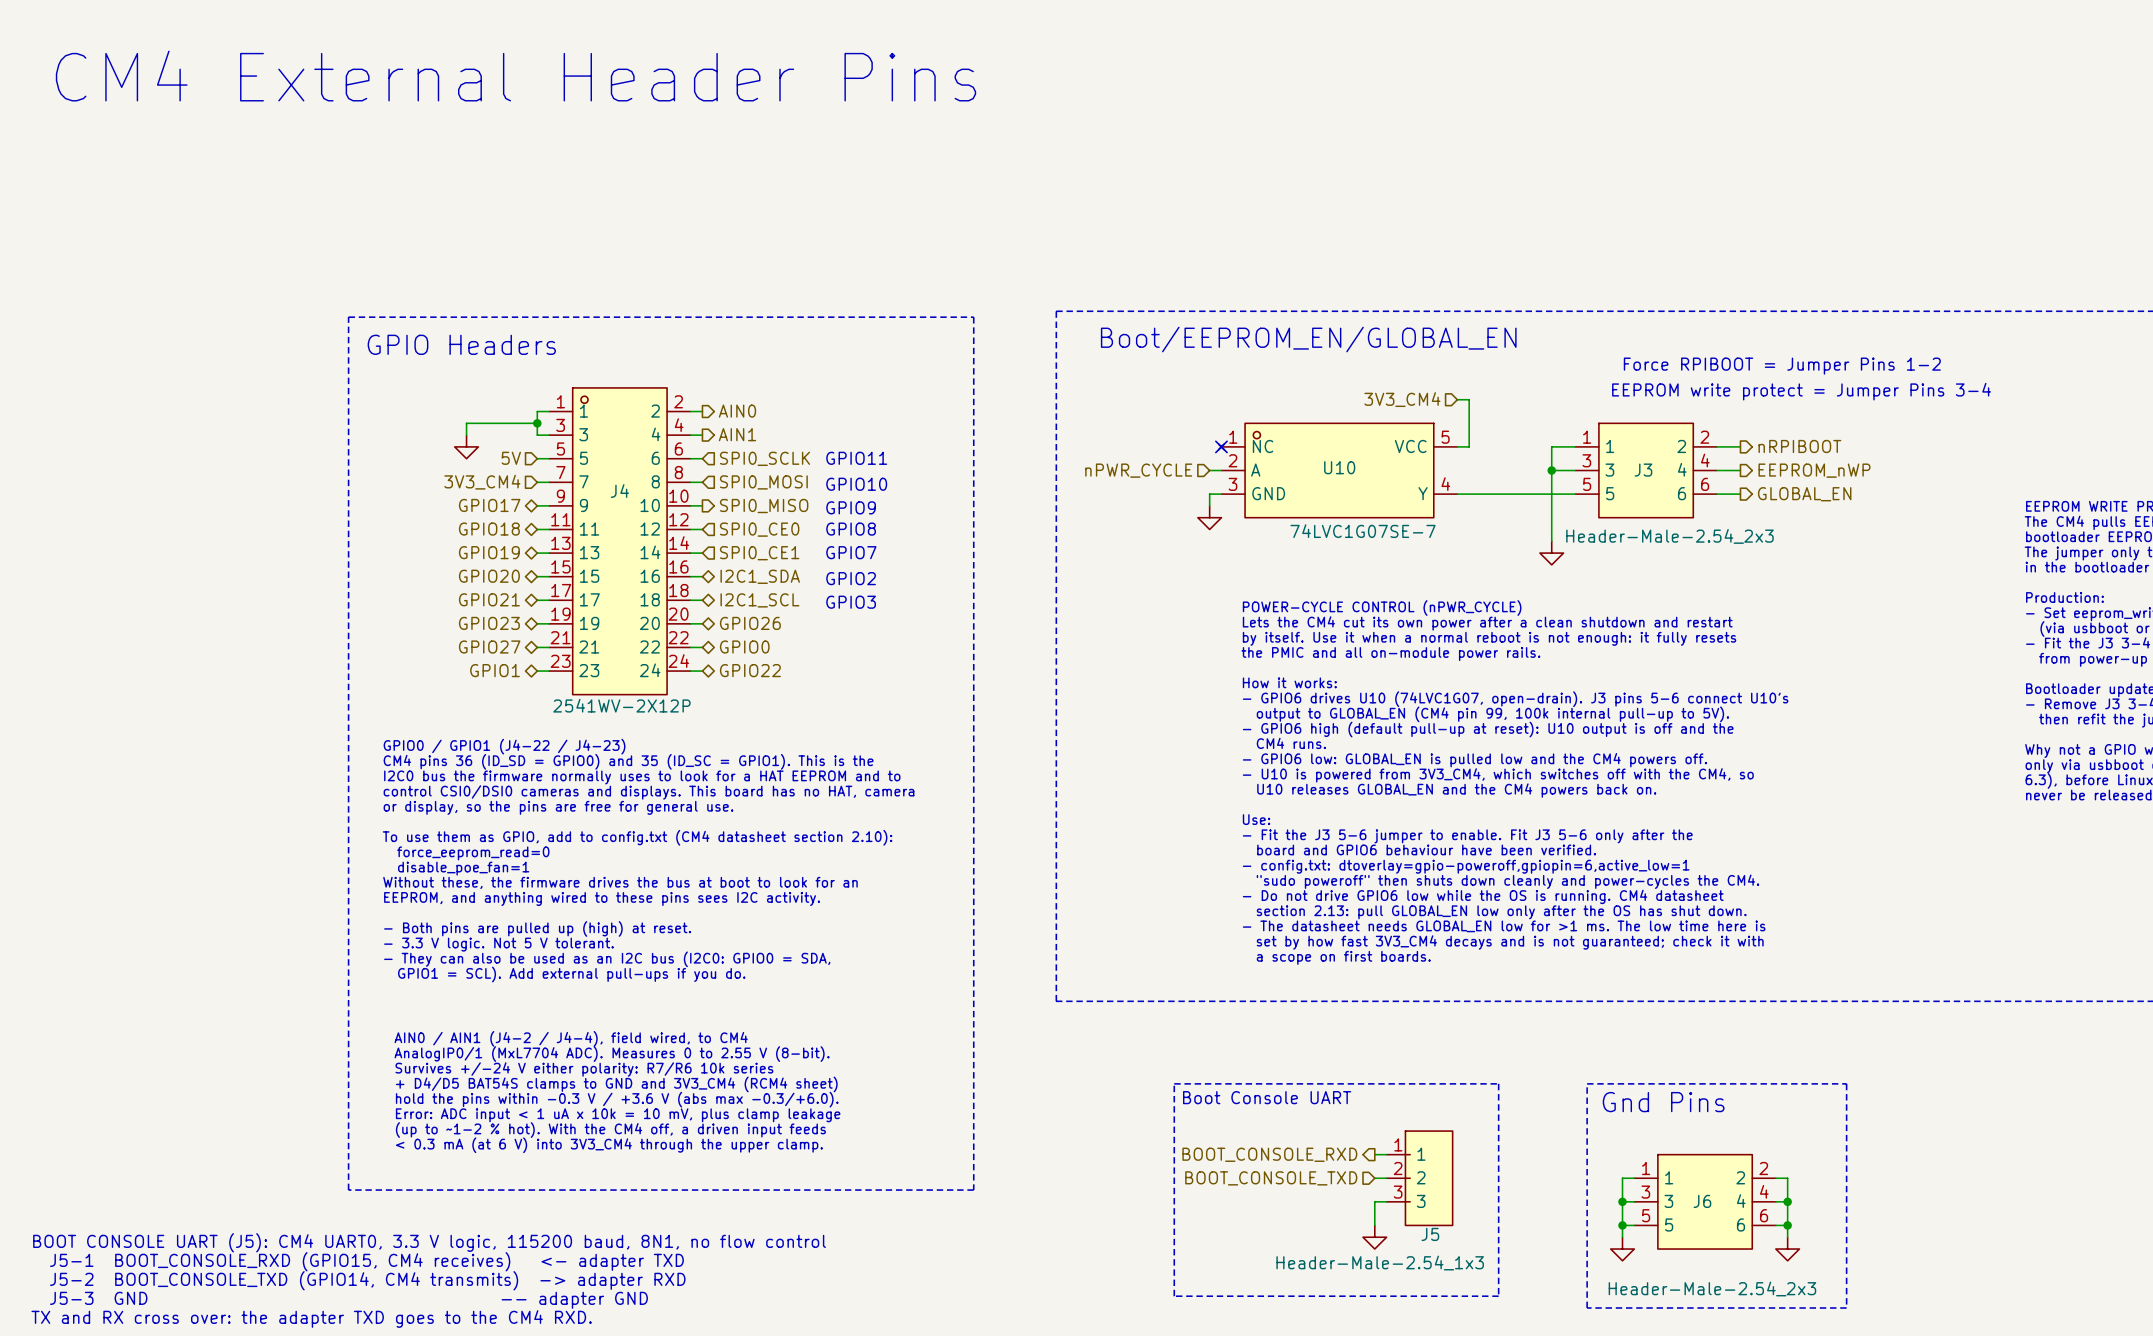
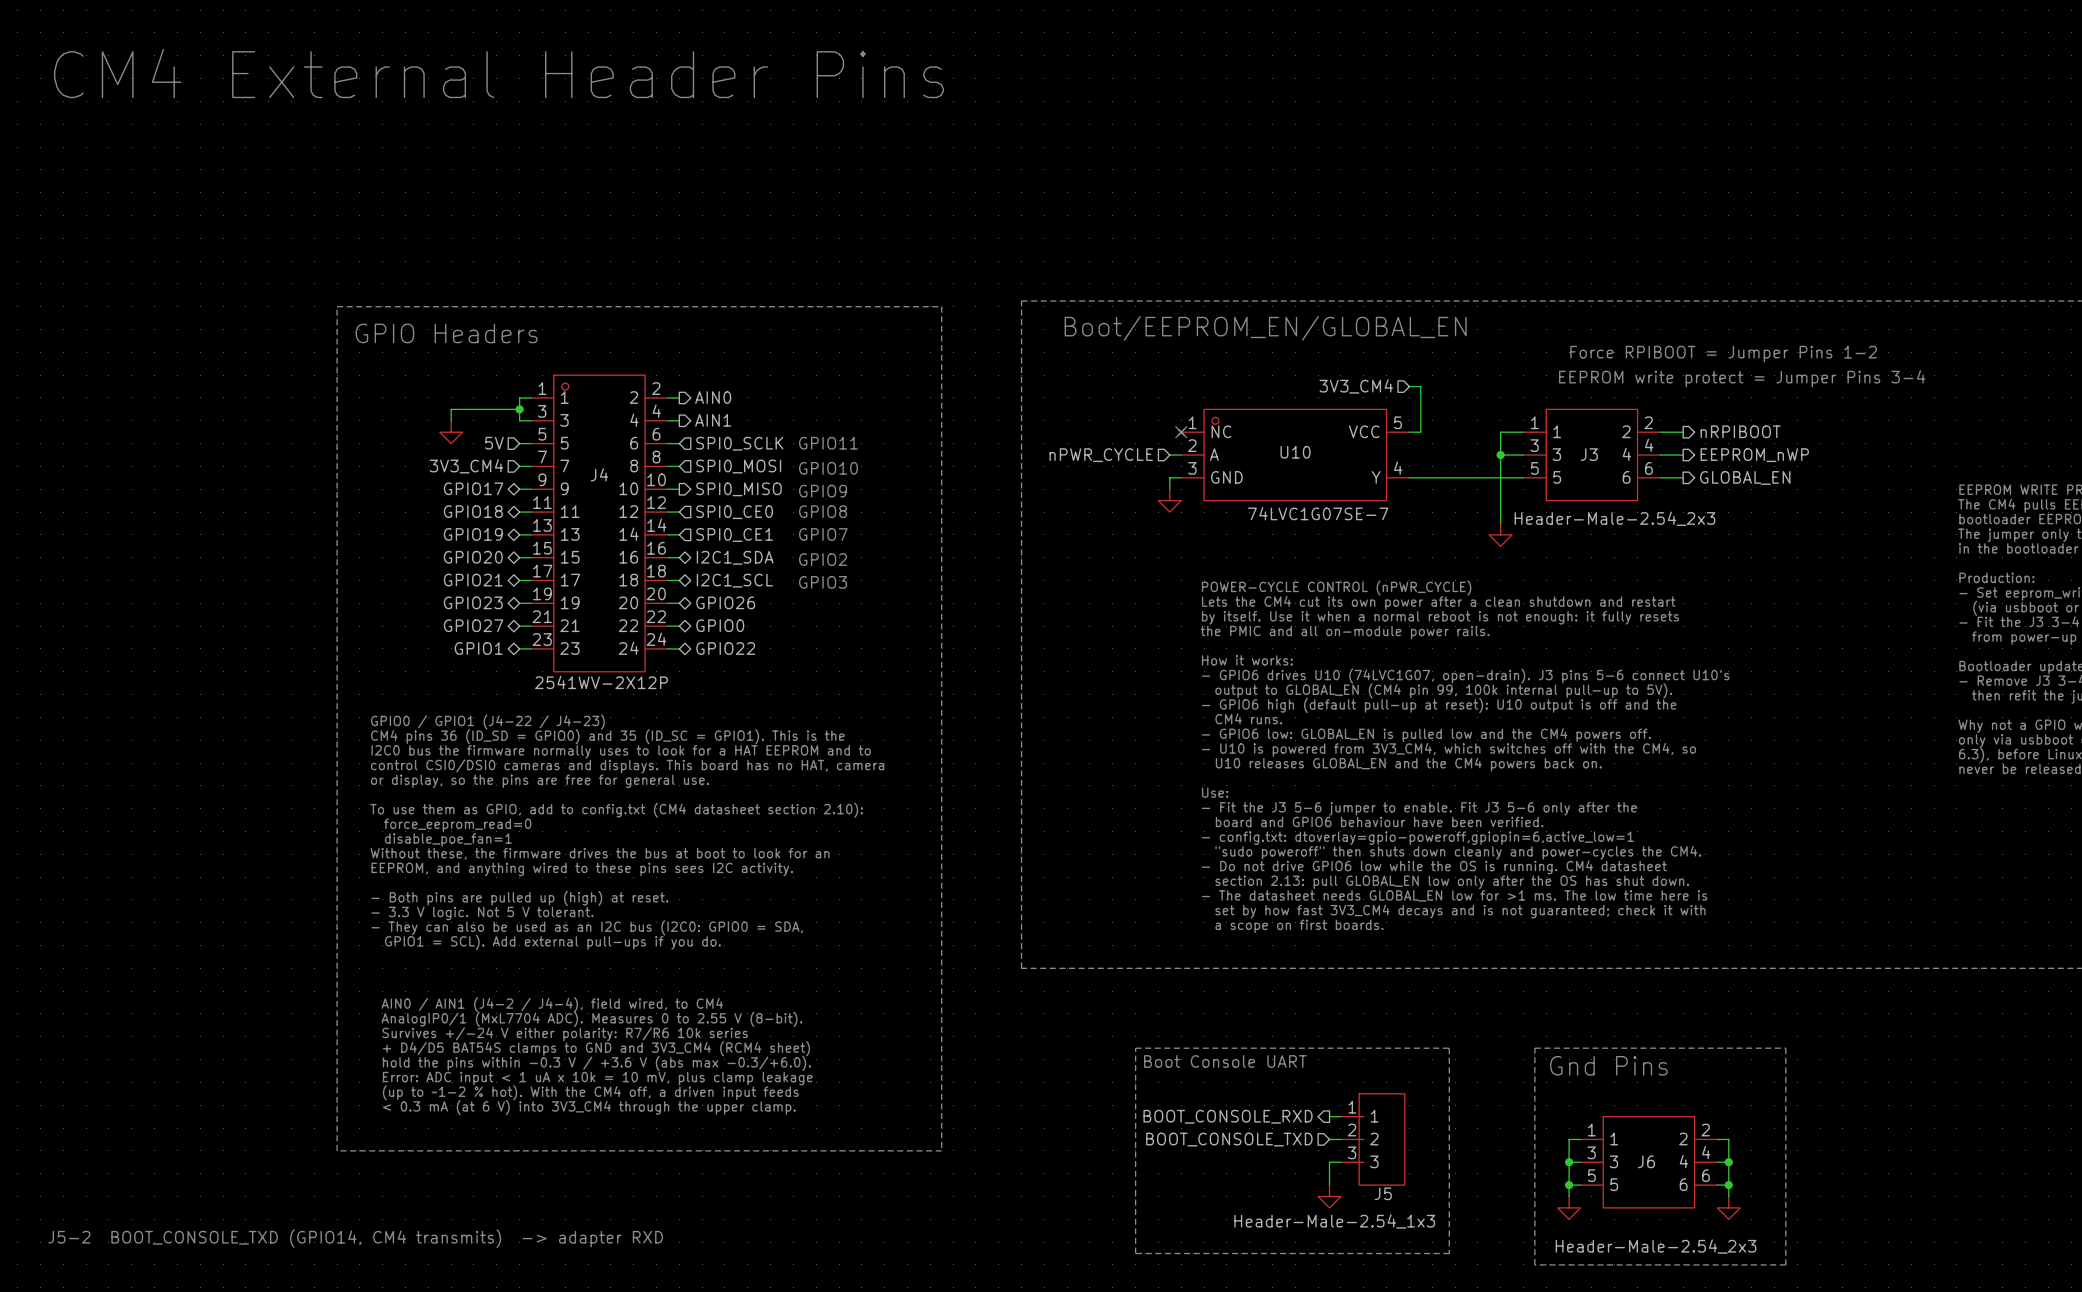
text: BOOT CONSOLE UART (J5): CM4 UART0, 3.3 V logic, 115200 baud, 8N1, no flow control (429, 1242) -> none
text: J5-1 BOOT_CONSOLE_RXD (GPIO15, CM4 receives) <- adapter TXD (366, 1261) -> none
text: J5-3 GND -- adapter GND (348, 1300) -> none
text: TX and RX cross over: the adapter TXD goes to the CM4 RXD. (311, 1319) -> none

